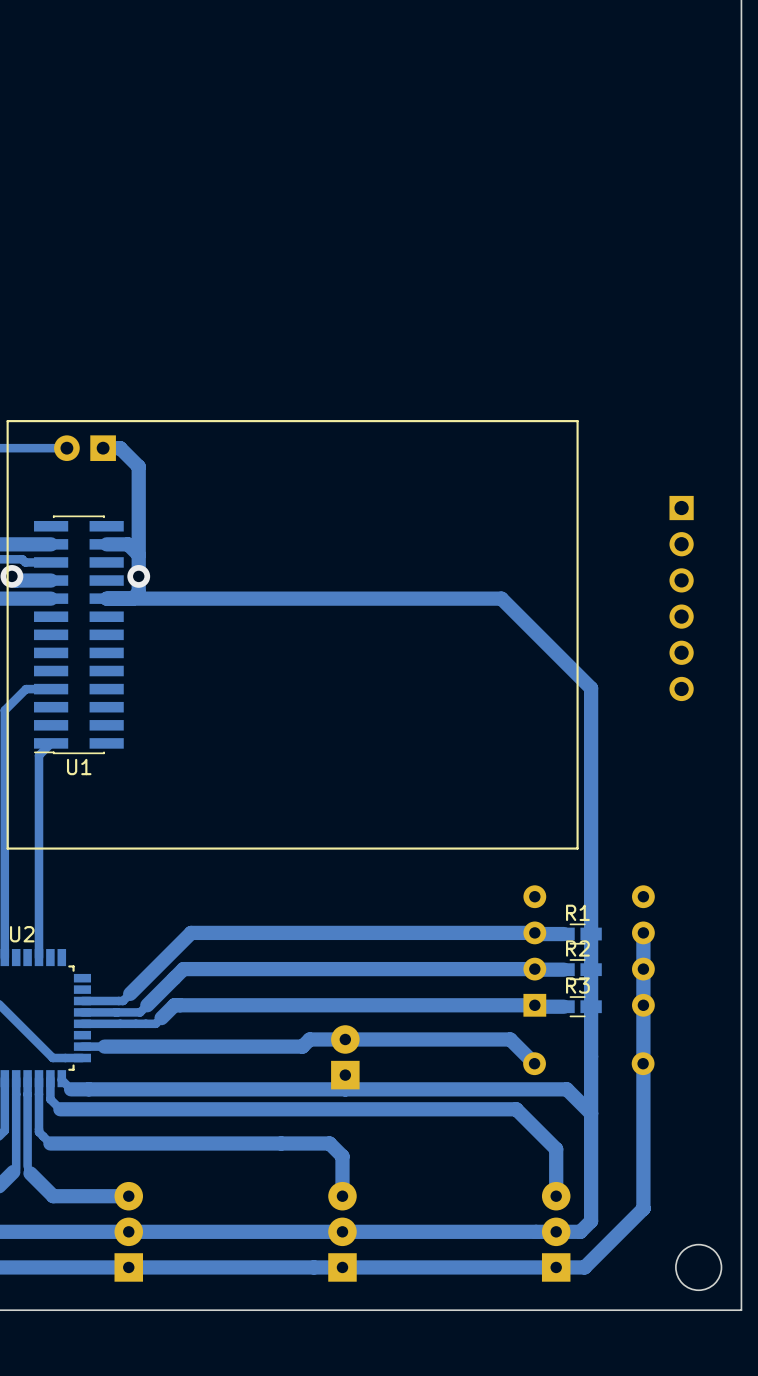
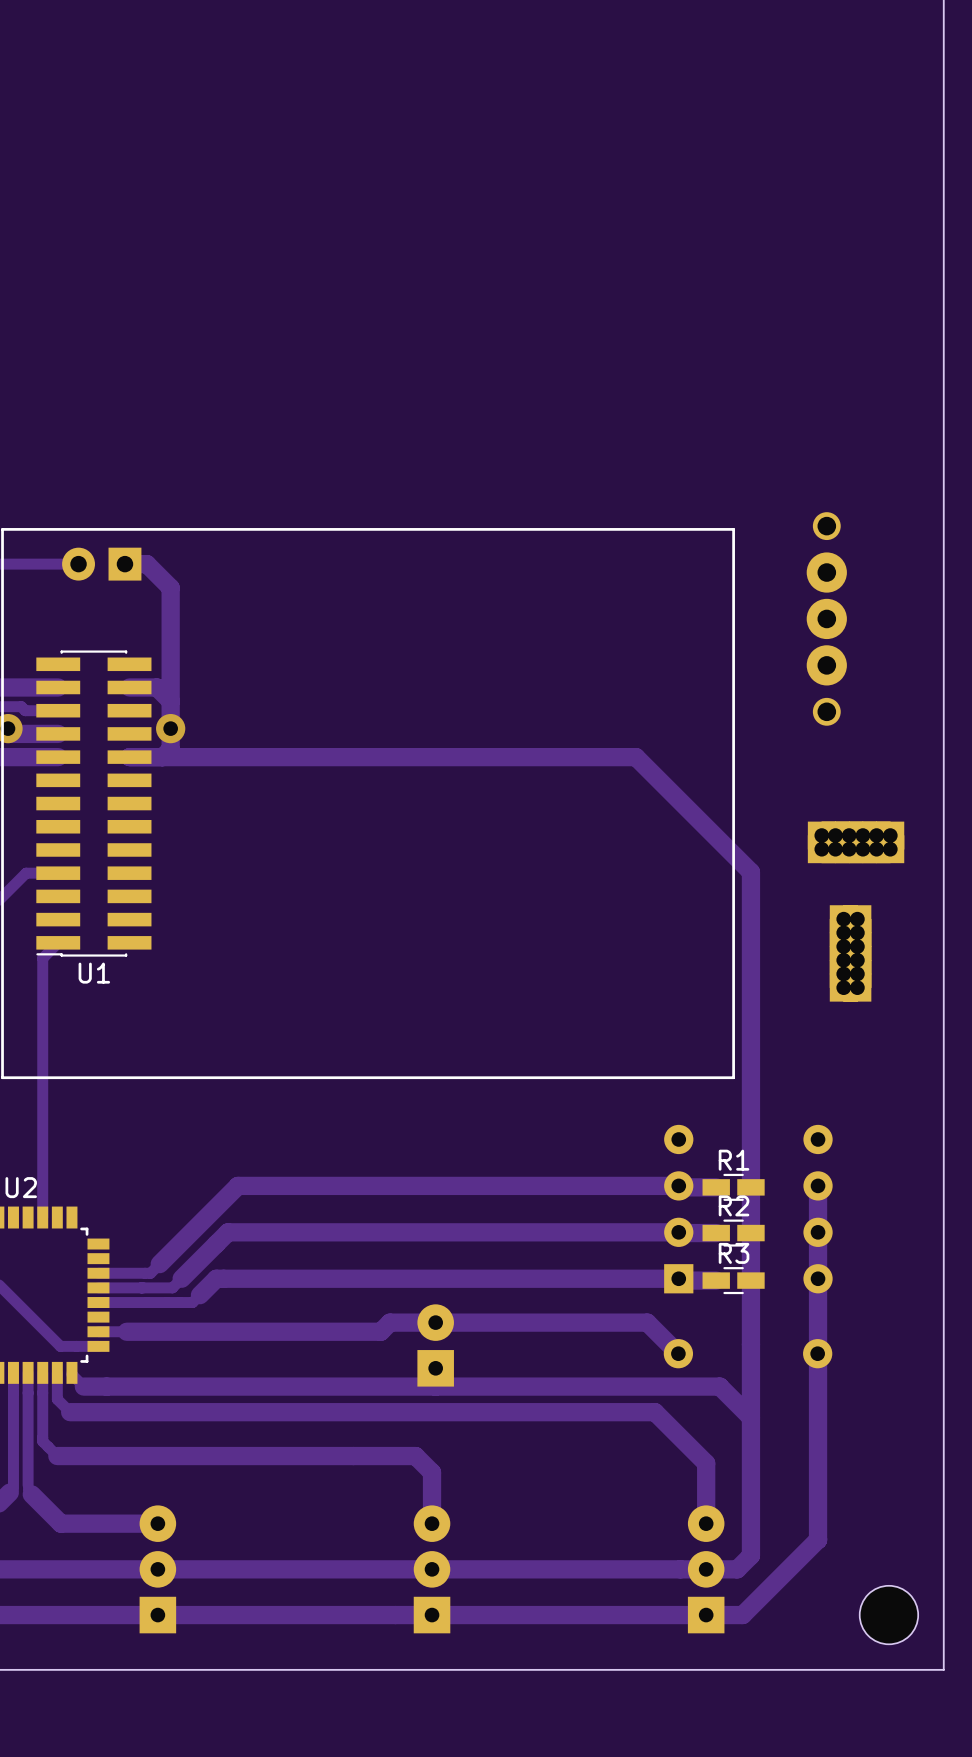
part: none -> (826, 618)
part: (681, 598) -> none
part: none -> (856, 911)

